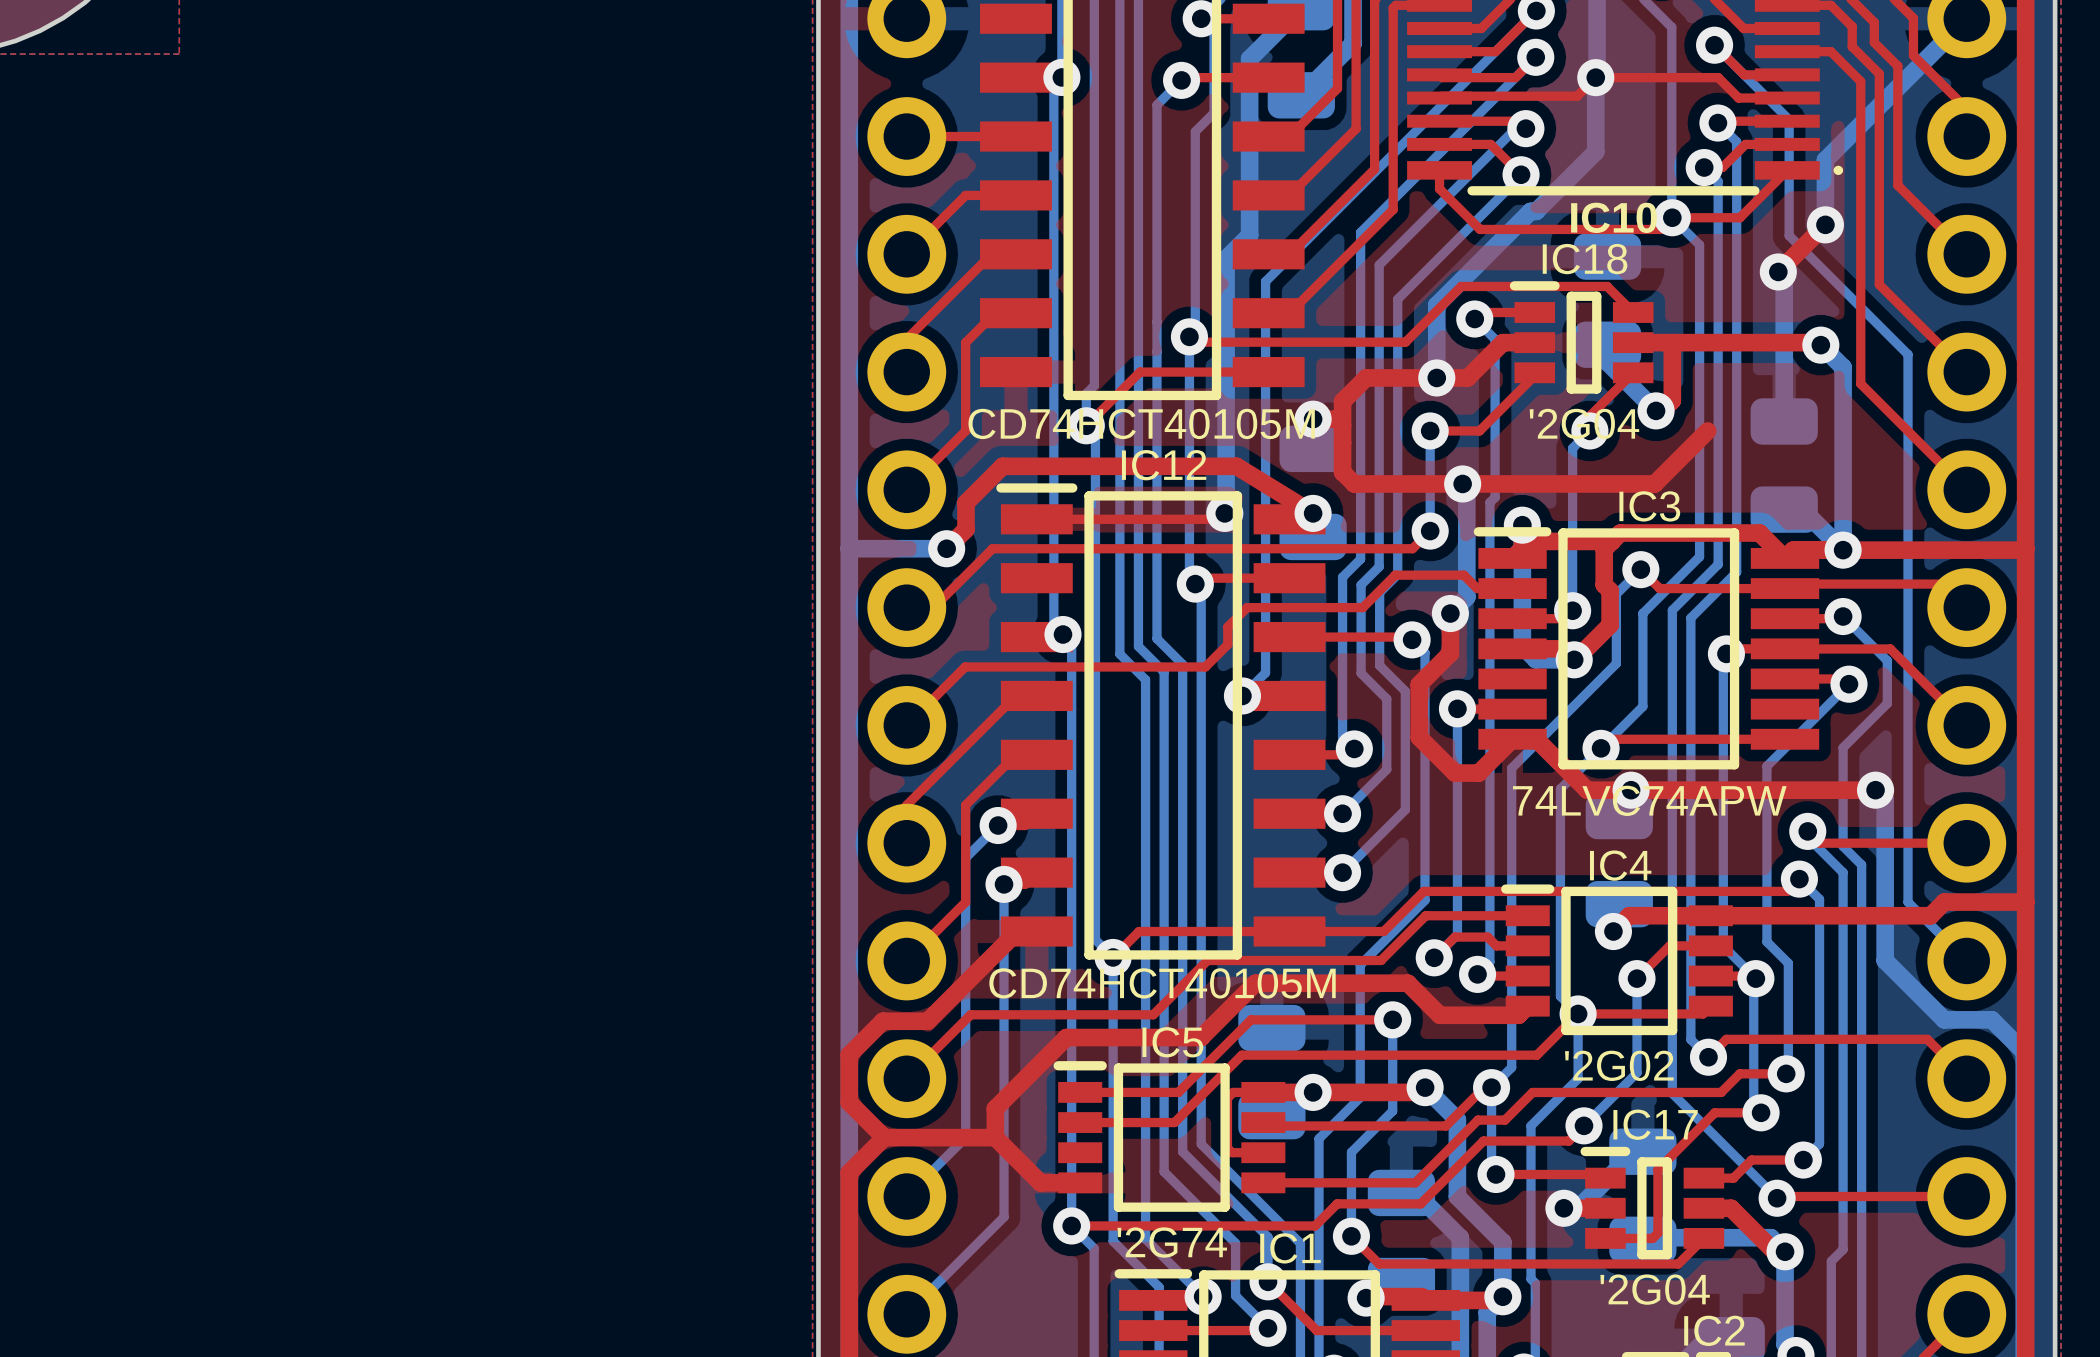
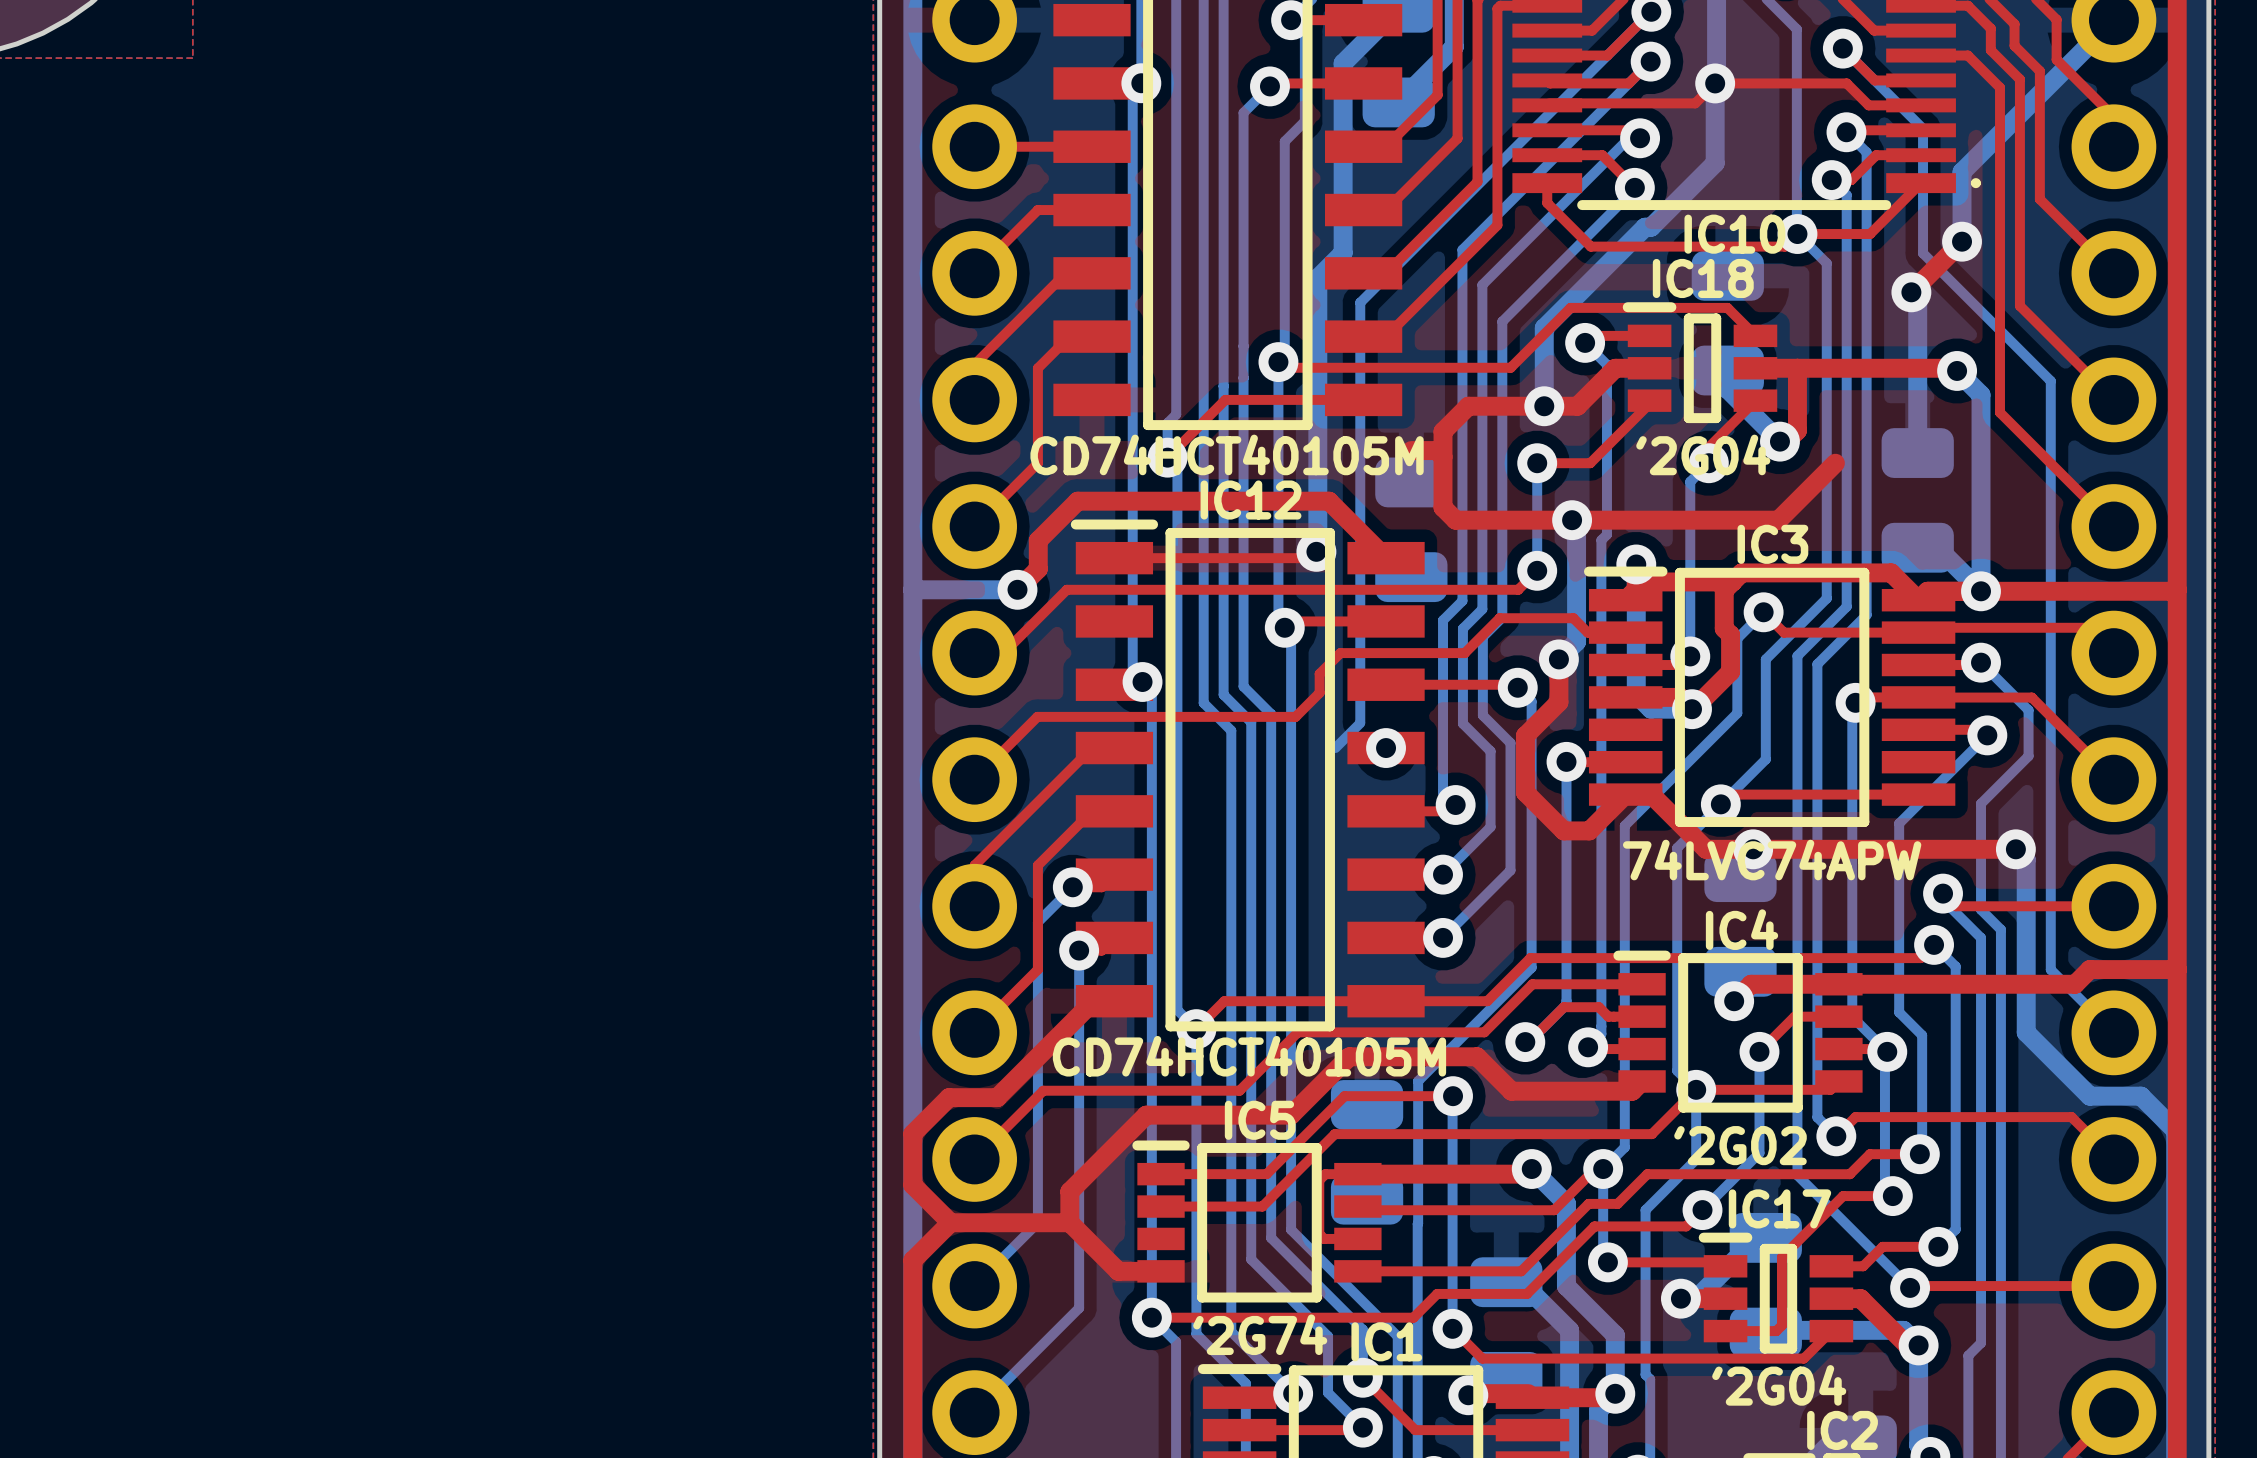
via: (1313, 419) -> none
top track: (1236, 466) (1313, 513) -> (1329, 501) (1386, 558)
via: (1313, 513) -> none
via position: (1242, 695) -> (1386, 748)
via position: (1434, 957) -> (1525, 1042)
bottom track: (1360, 965) (1360, 1097) (1319, 1138) -> (1462, 1037) (1418, 1081) (1418, 1223)
top track: (1374, 983) (1407, 983) (1439, 1015) -> (1477, 1056) (1511, 1091) (1547, 1091)
top track: (1351, 1019) (1392, 1019) -> none
via: none -> (1453, 1096)
bottom track: (1392, 1019) (1392, 1111) (1351, 1152) -> (1452, 1096) (1452, 1238)
via: (1392, 1019) -> none
via: (1313, 1092) -> none

